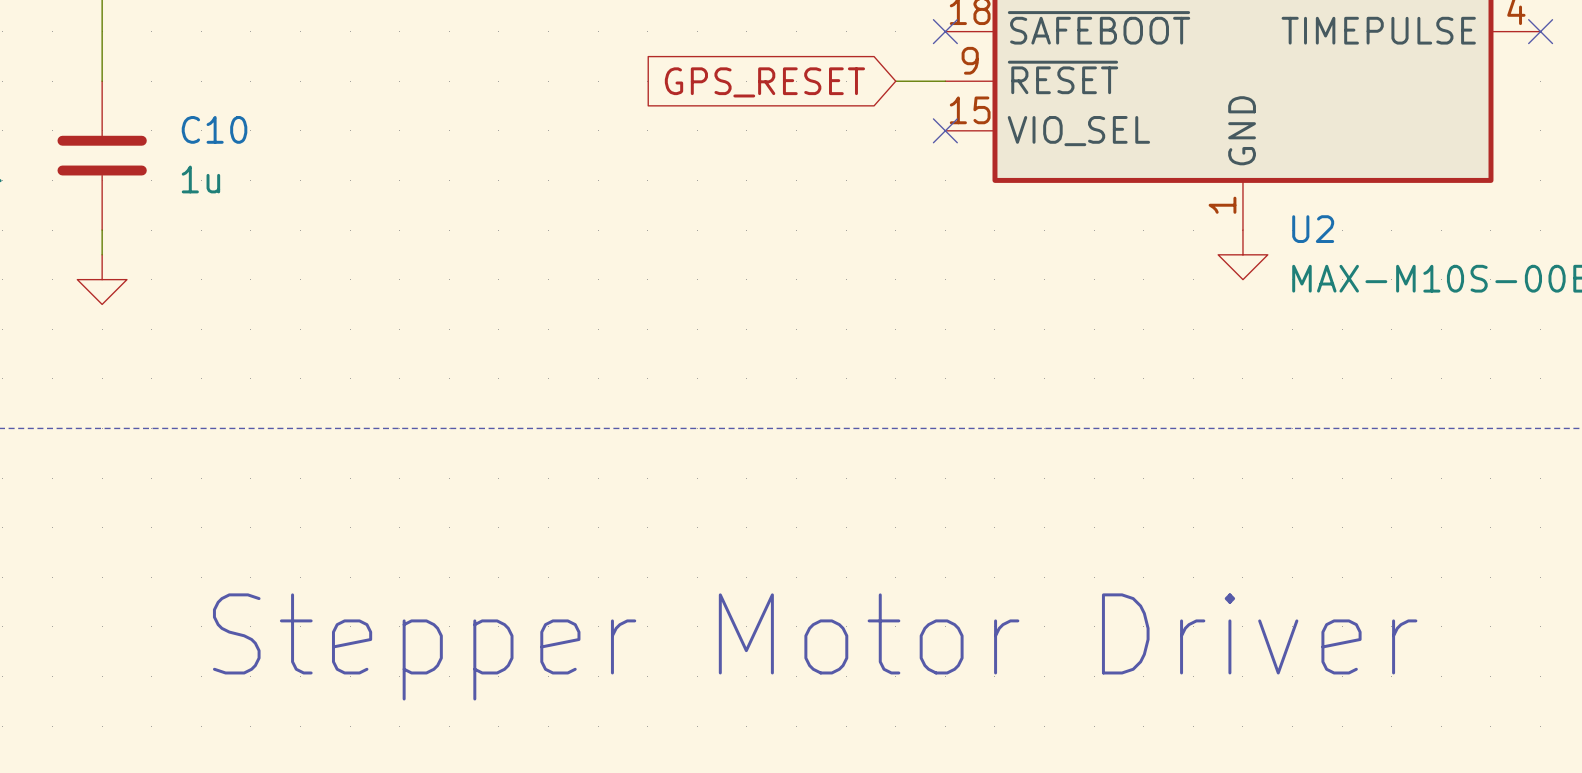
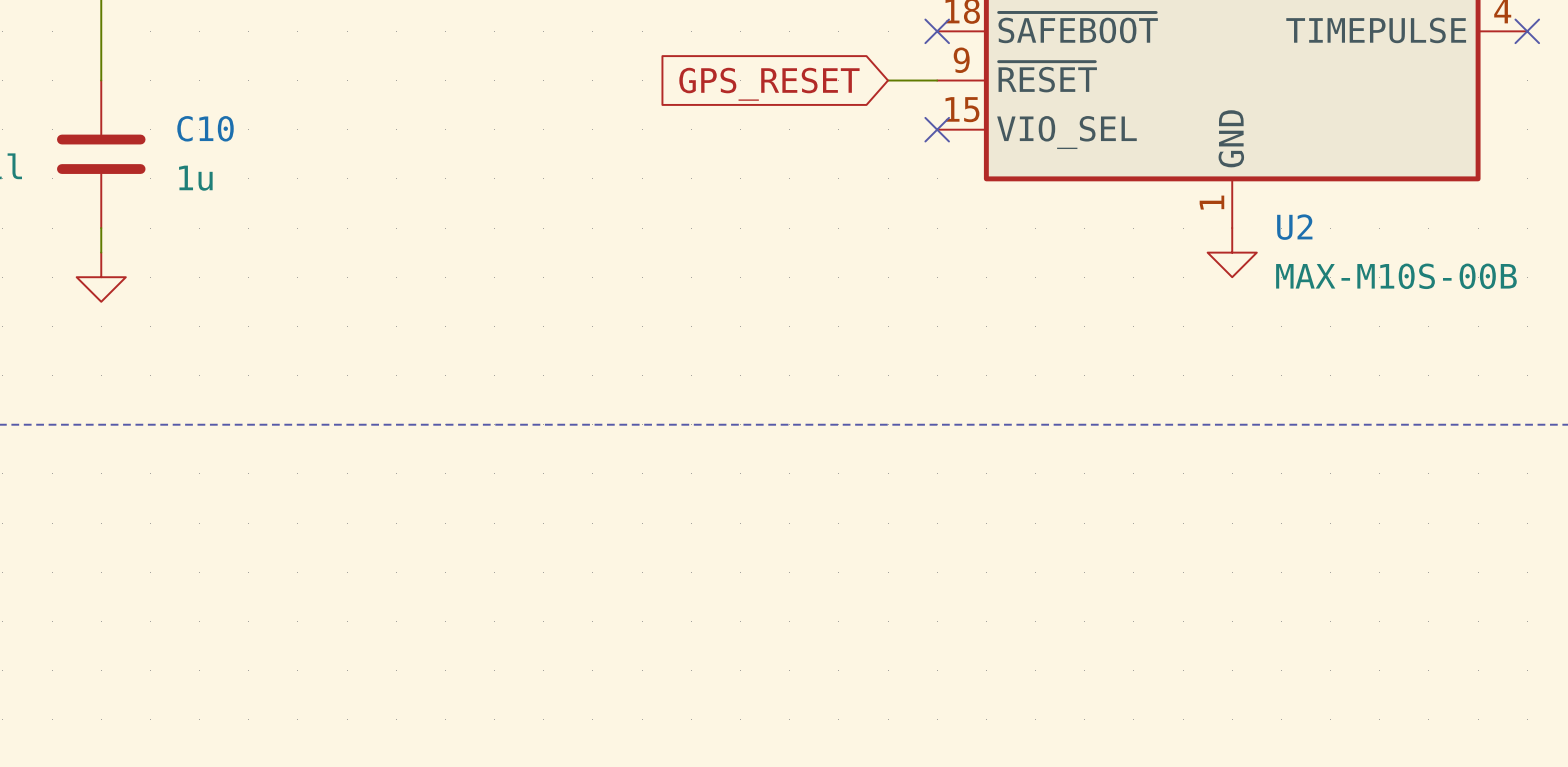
text: Stepper Motor Driver (815, 646) -> none

